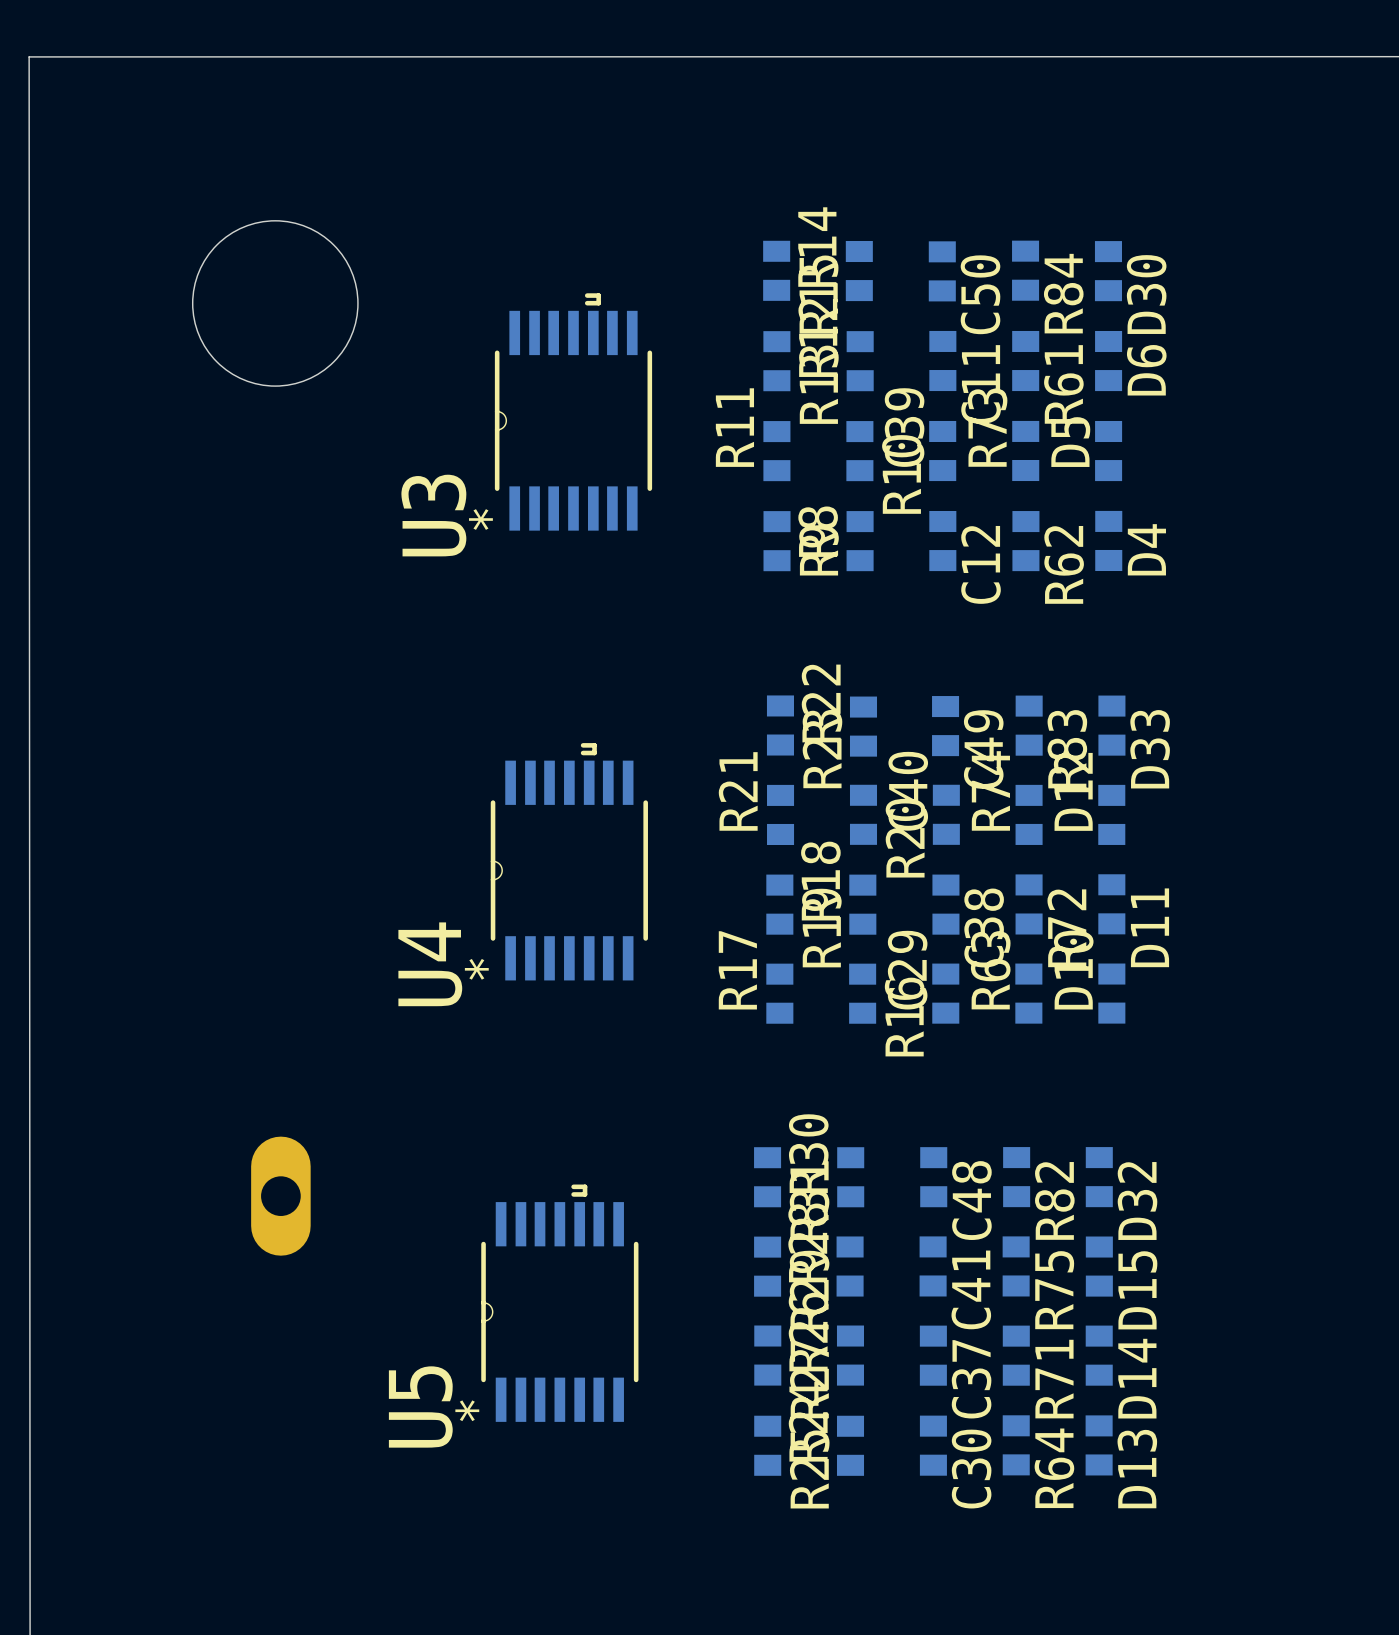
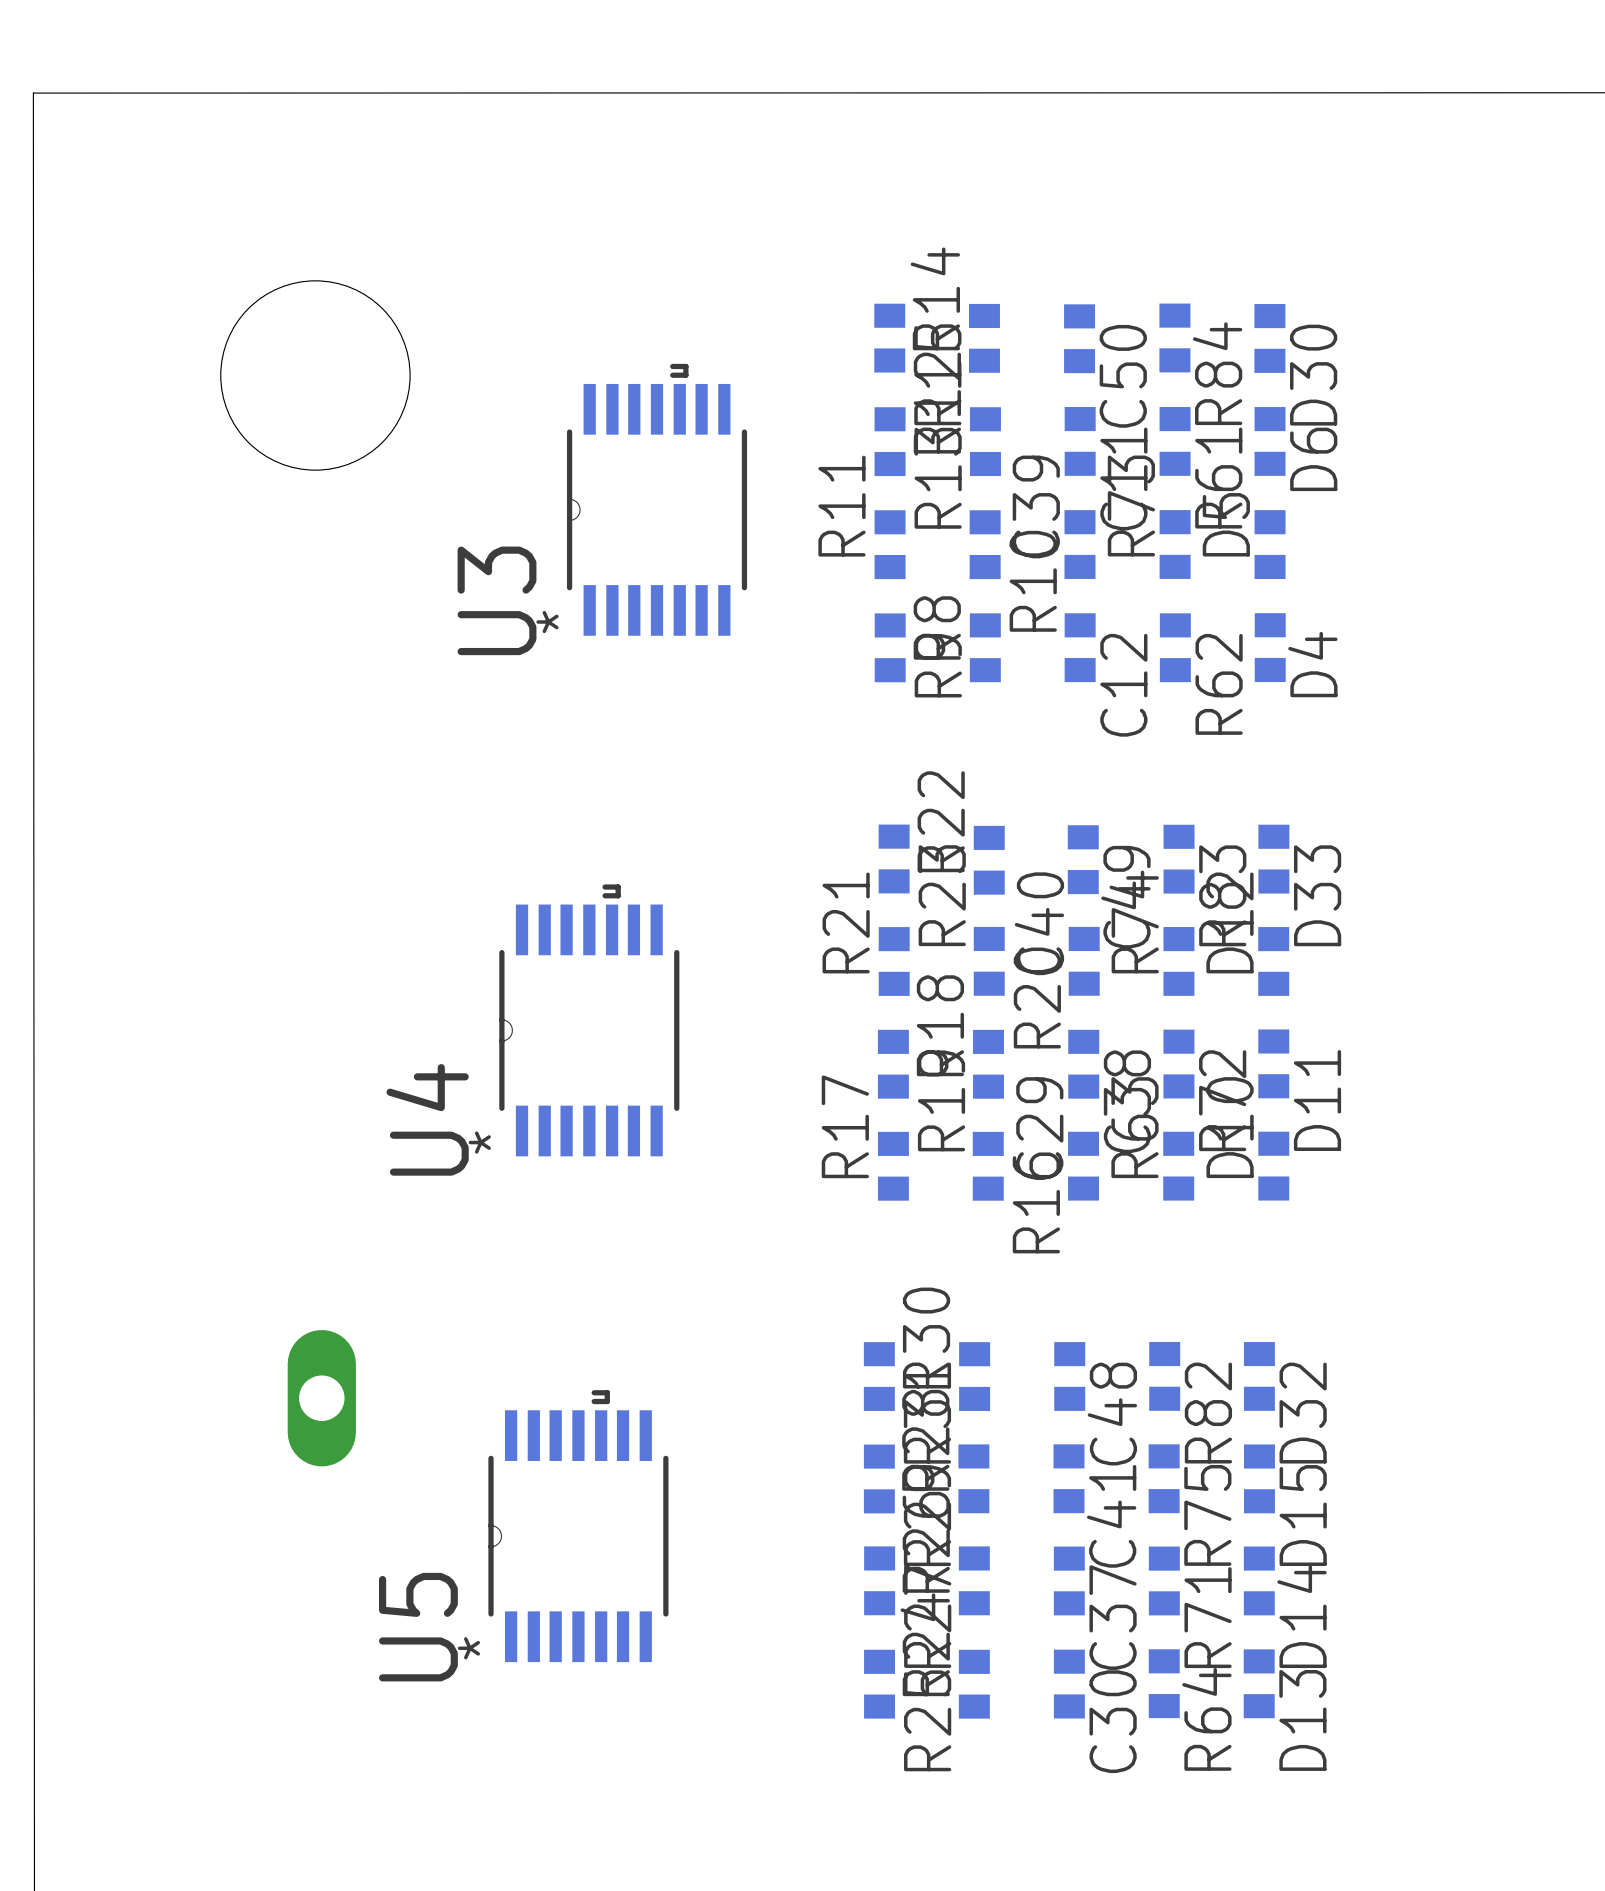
U4 position: (569, 861) -> (589, 1020)
U5 position: (559, 1303) -> (578, 1526)

